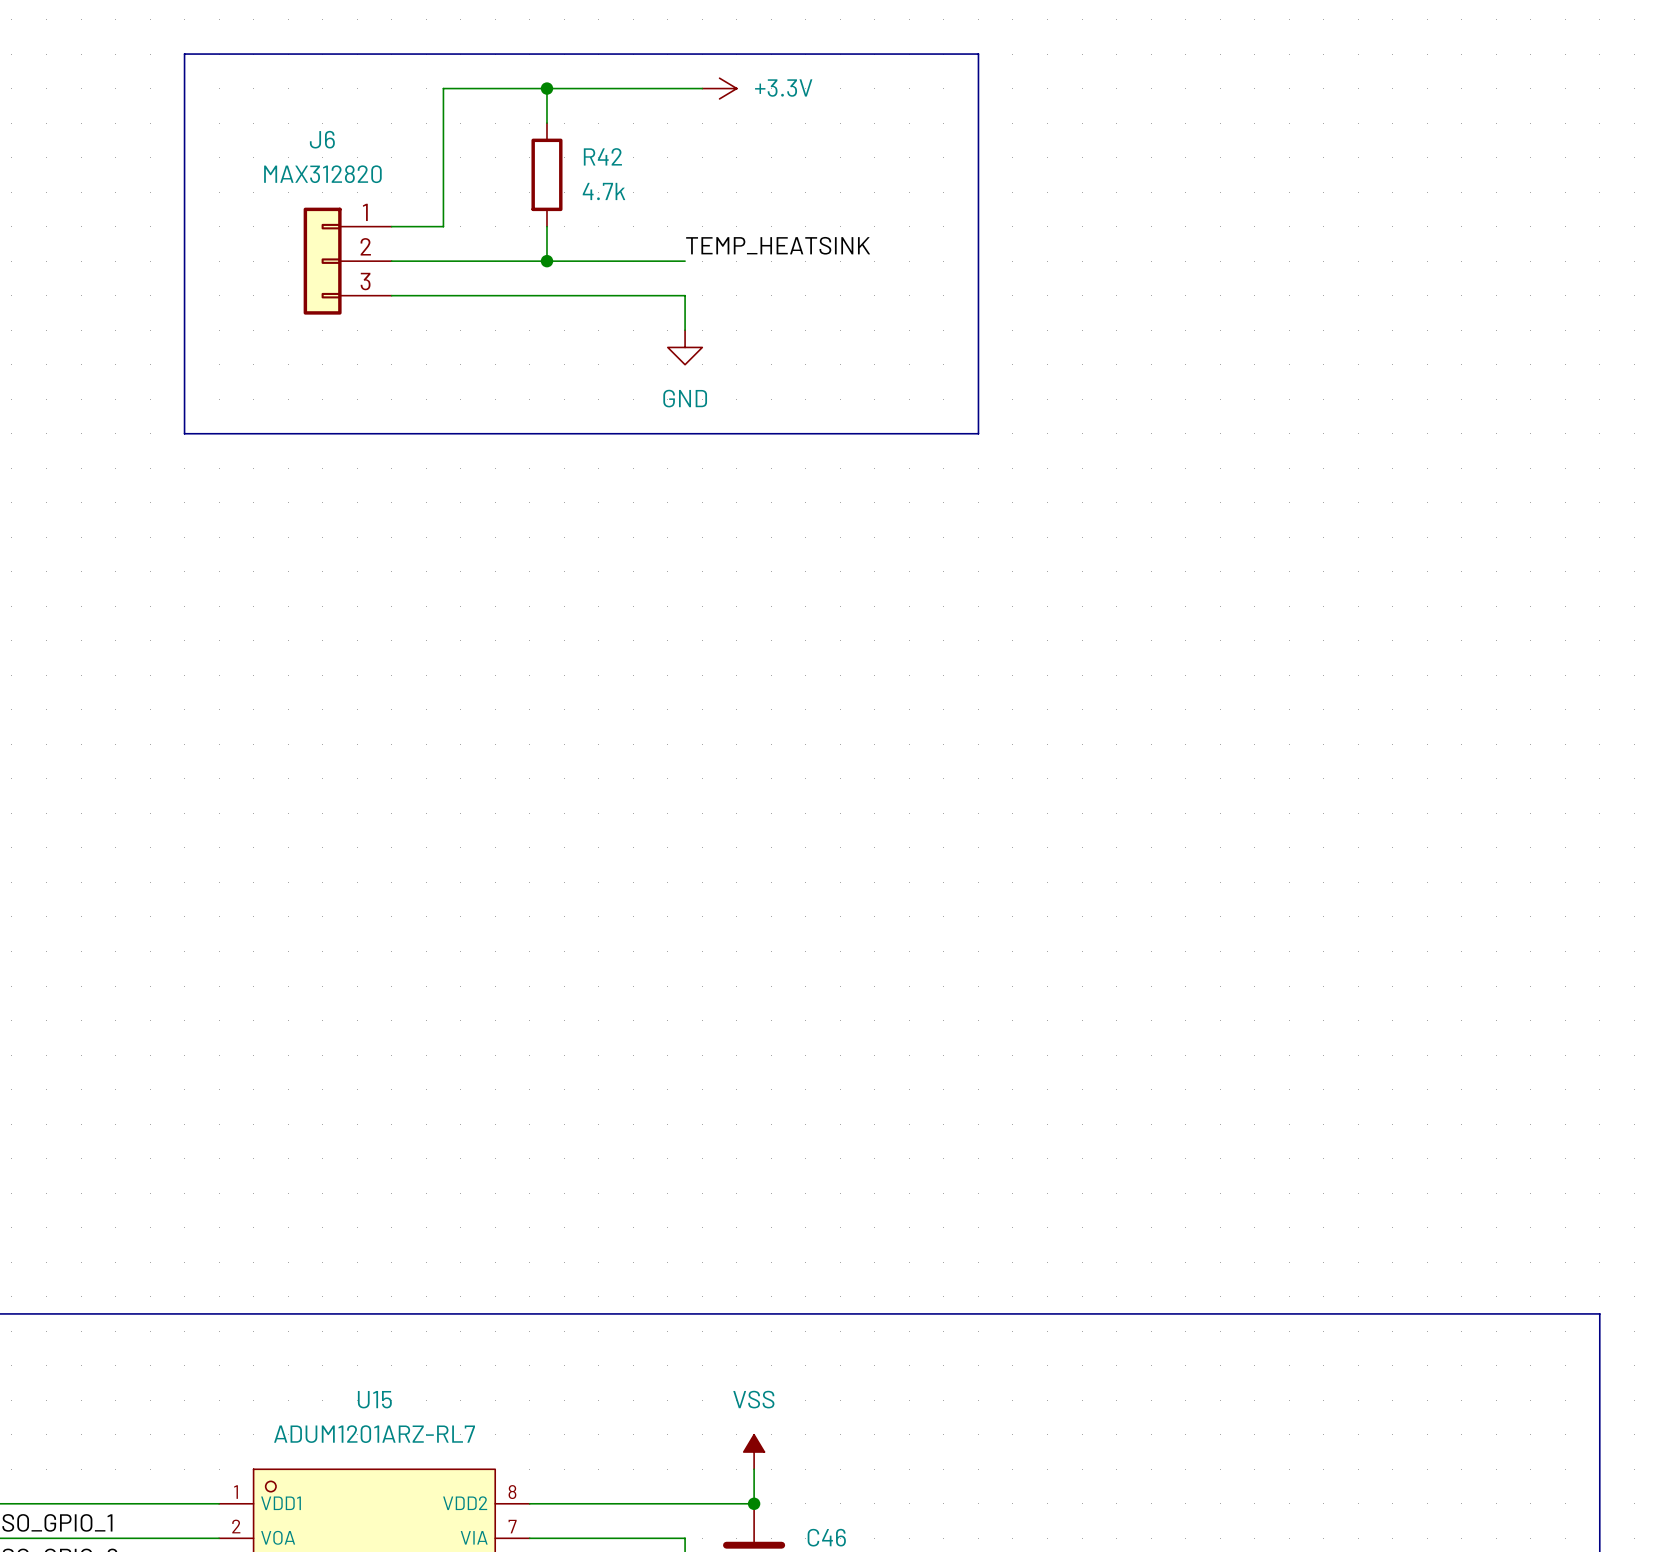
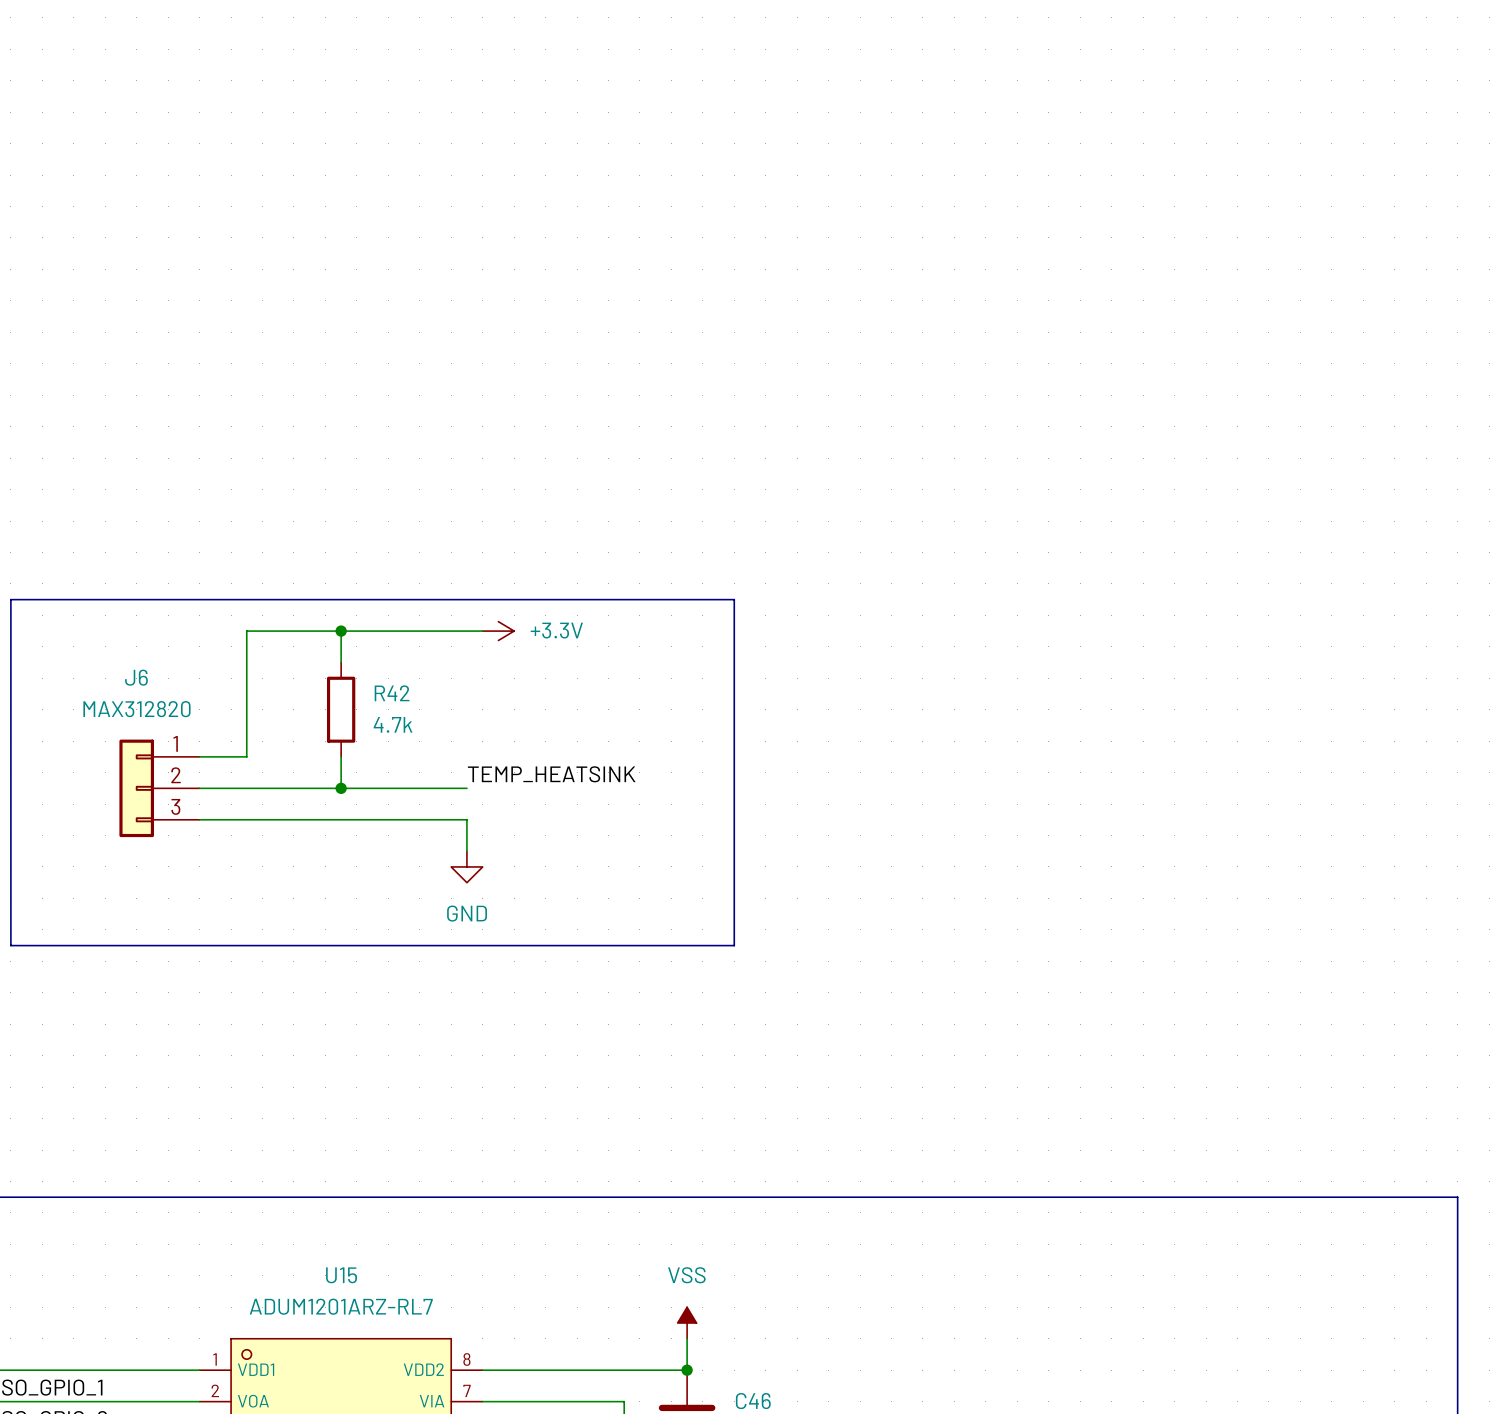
line: (184, 54) (978, 54) (978, 433) (184, 433) (184, 54) -> none
wire: (546, 88) (546, 123) -> none
junction: (546, 88) -> none
wire: (702, 88) (443, 88) (443, 226) (391, 226) -> none
power symbol: +3.3V (719, 88) -> none
R42 position: (546, 174) -> (341, 709)
wire: (546, 226) (546, 261) -> none
label: TEMP_HEATSINK (778, 245) -> none
J6 position: (347, 261) -> (159, 788)
wire: (391, 261) (685, 261) -> none
junction: (546, 261) -> none
wire: (391, 295) (685, 295) (685, 330) -> none
power symbol: GND (685, 347) -> none
line: none -> (10, 599) (734, 599) (734, 945) (10, 945) (10, 599)
wire: none -> (341, 631) (341, 662)
junction: none -> (341, 631)
wire: none -> (482, 631) (246, 631) (246, 756) (199, 756)
power symbol: none -> +3.3V (498, 631)
wire: none -> (341, 756) (341, 788)
label: none -> TEMP_HEATSINK (551, 774)
wire: none -> (199, 788) (466, 788)
junction: none -> (341, 788)
wire: none -> (199, 819) (466, 819) (466, 851)
power symbol: none -> GND (466, 866)

